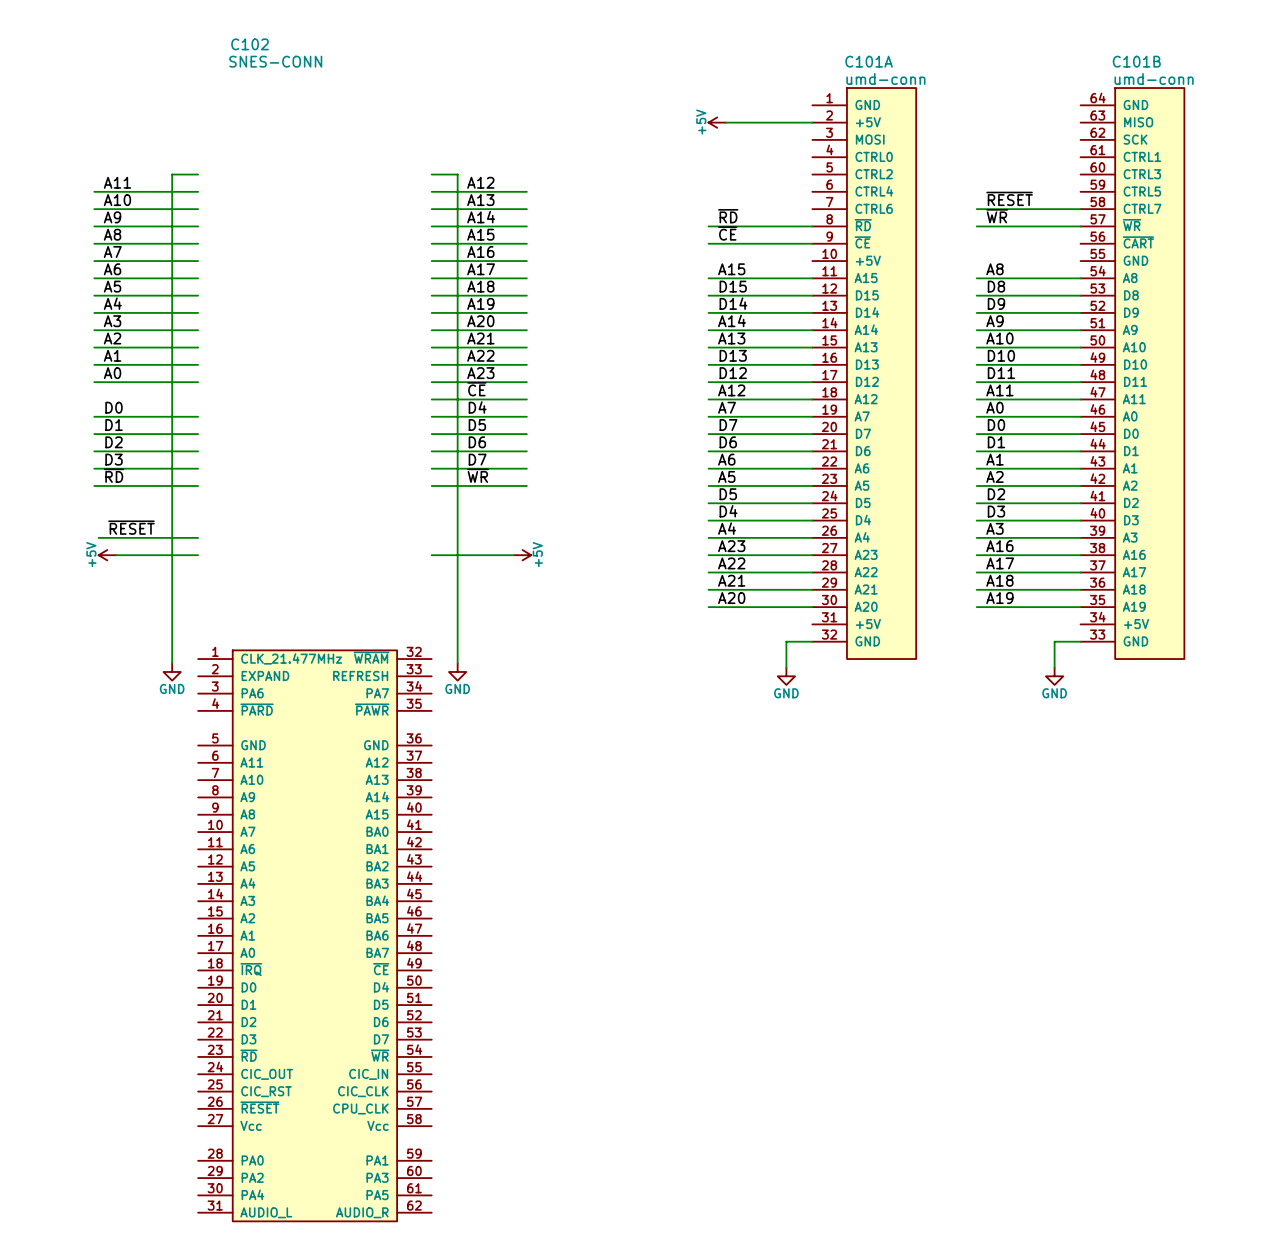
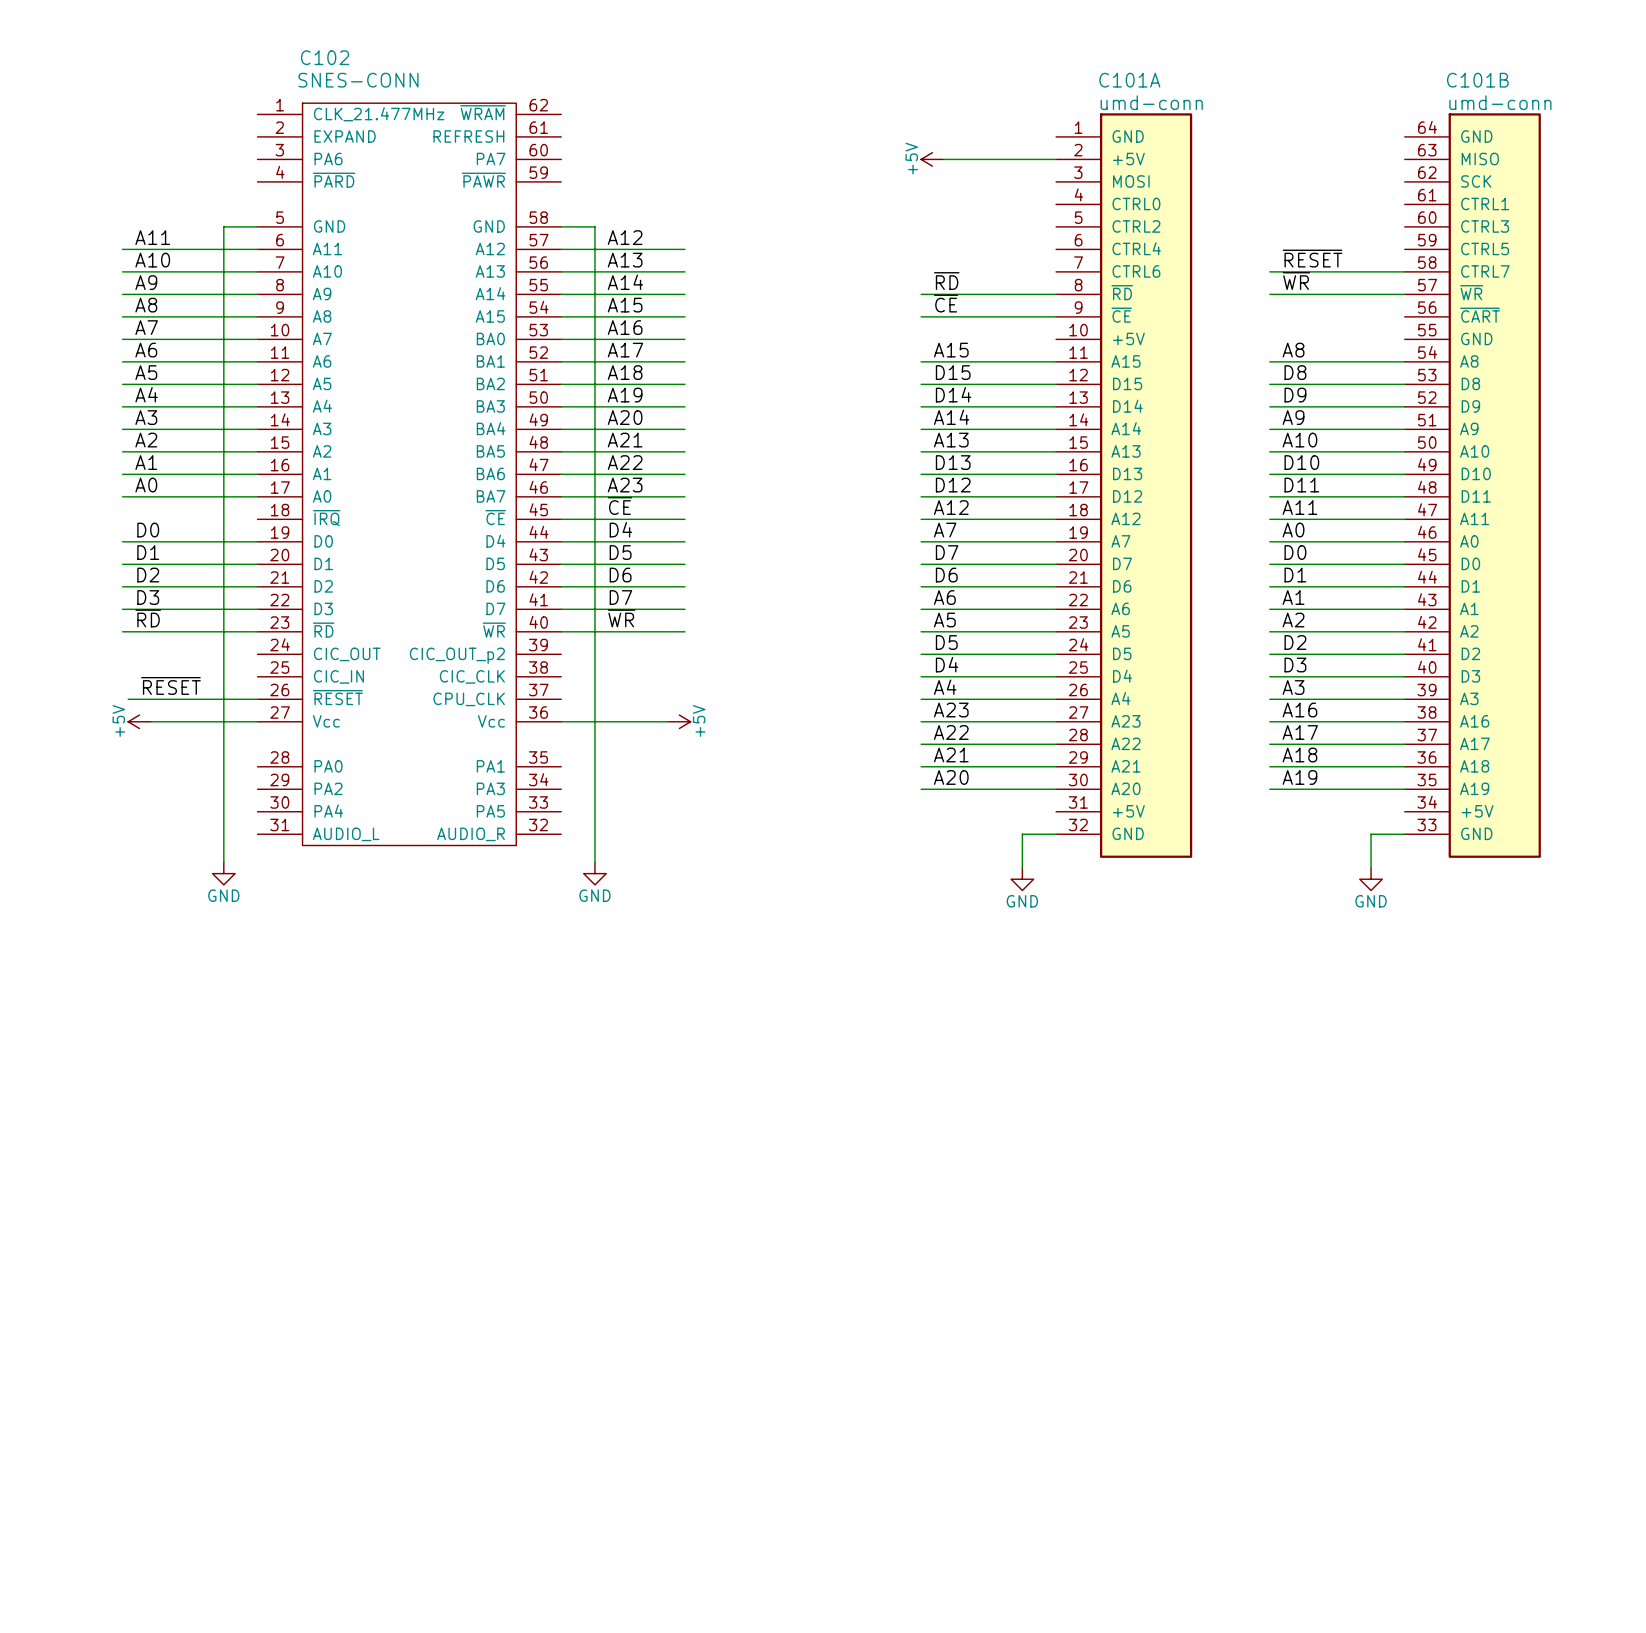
C102 symbol: [198, 649, 432, 1223] -> [257, 103, 562, 846]

